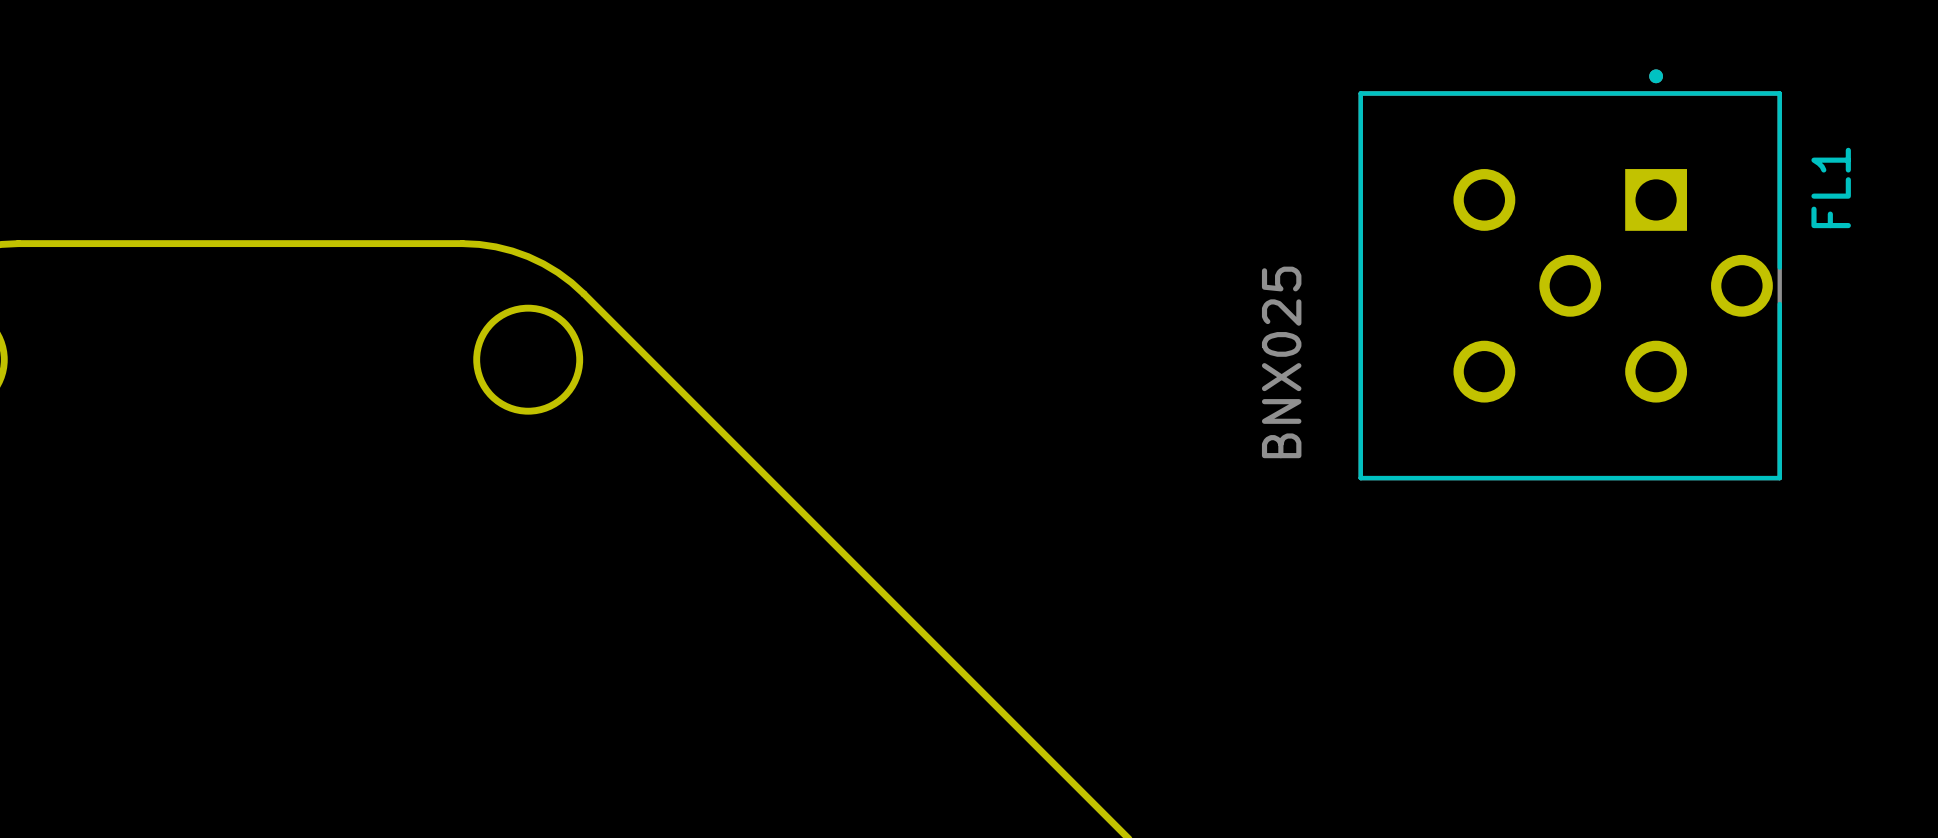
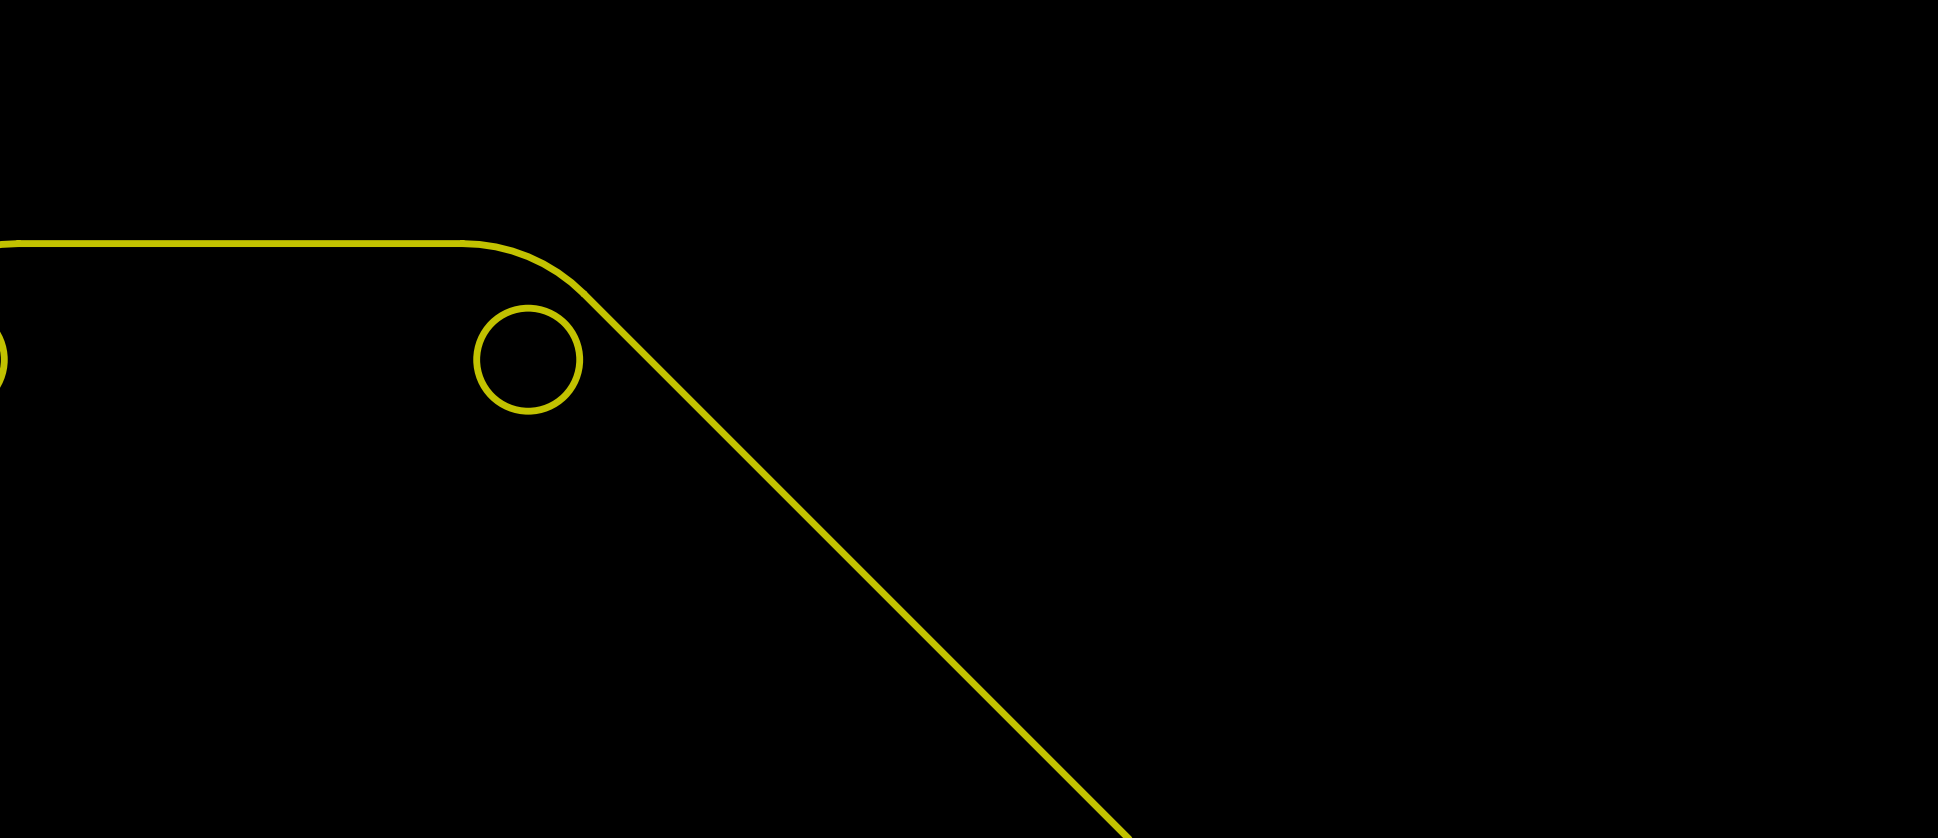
FL1: BNX025 (1570, 274) -> none

